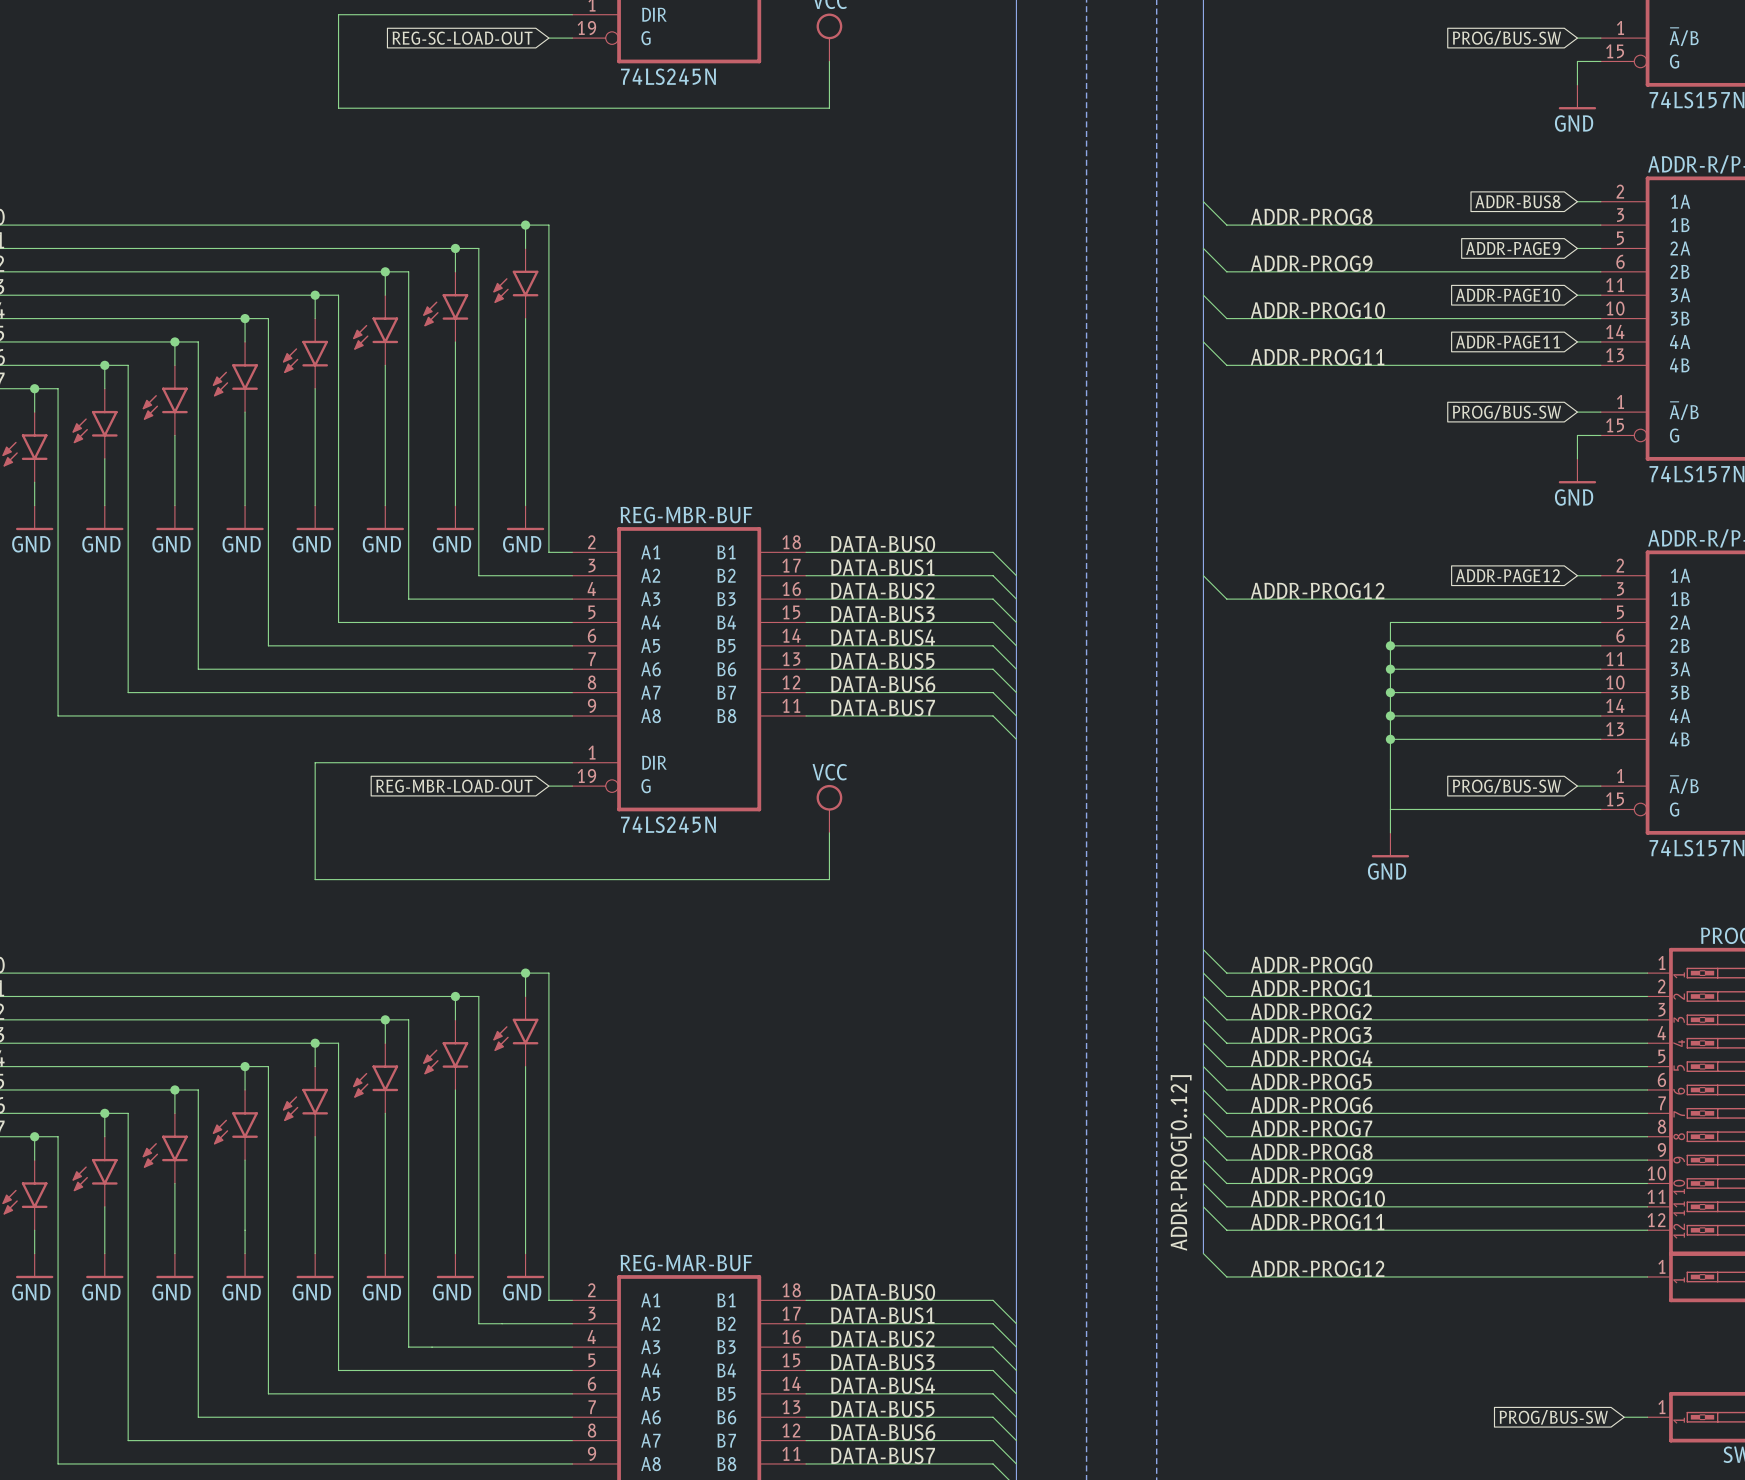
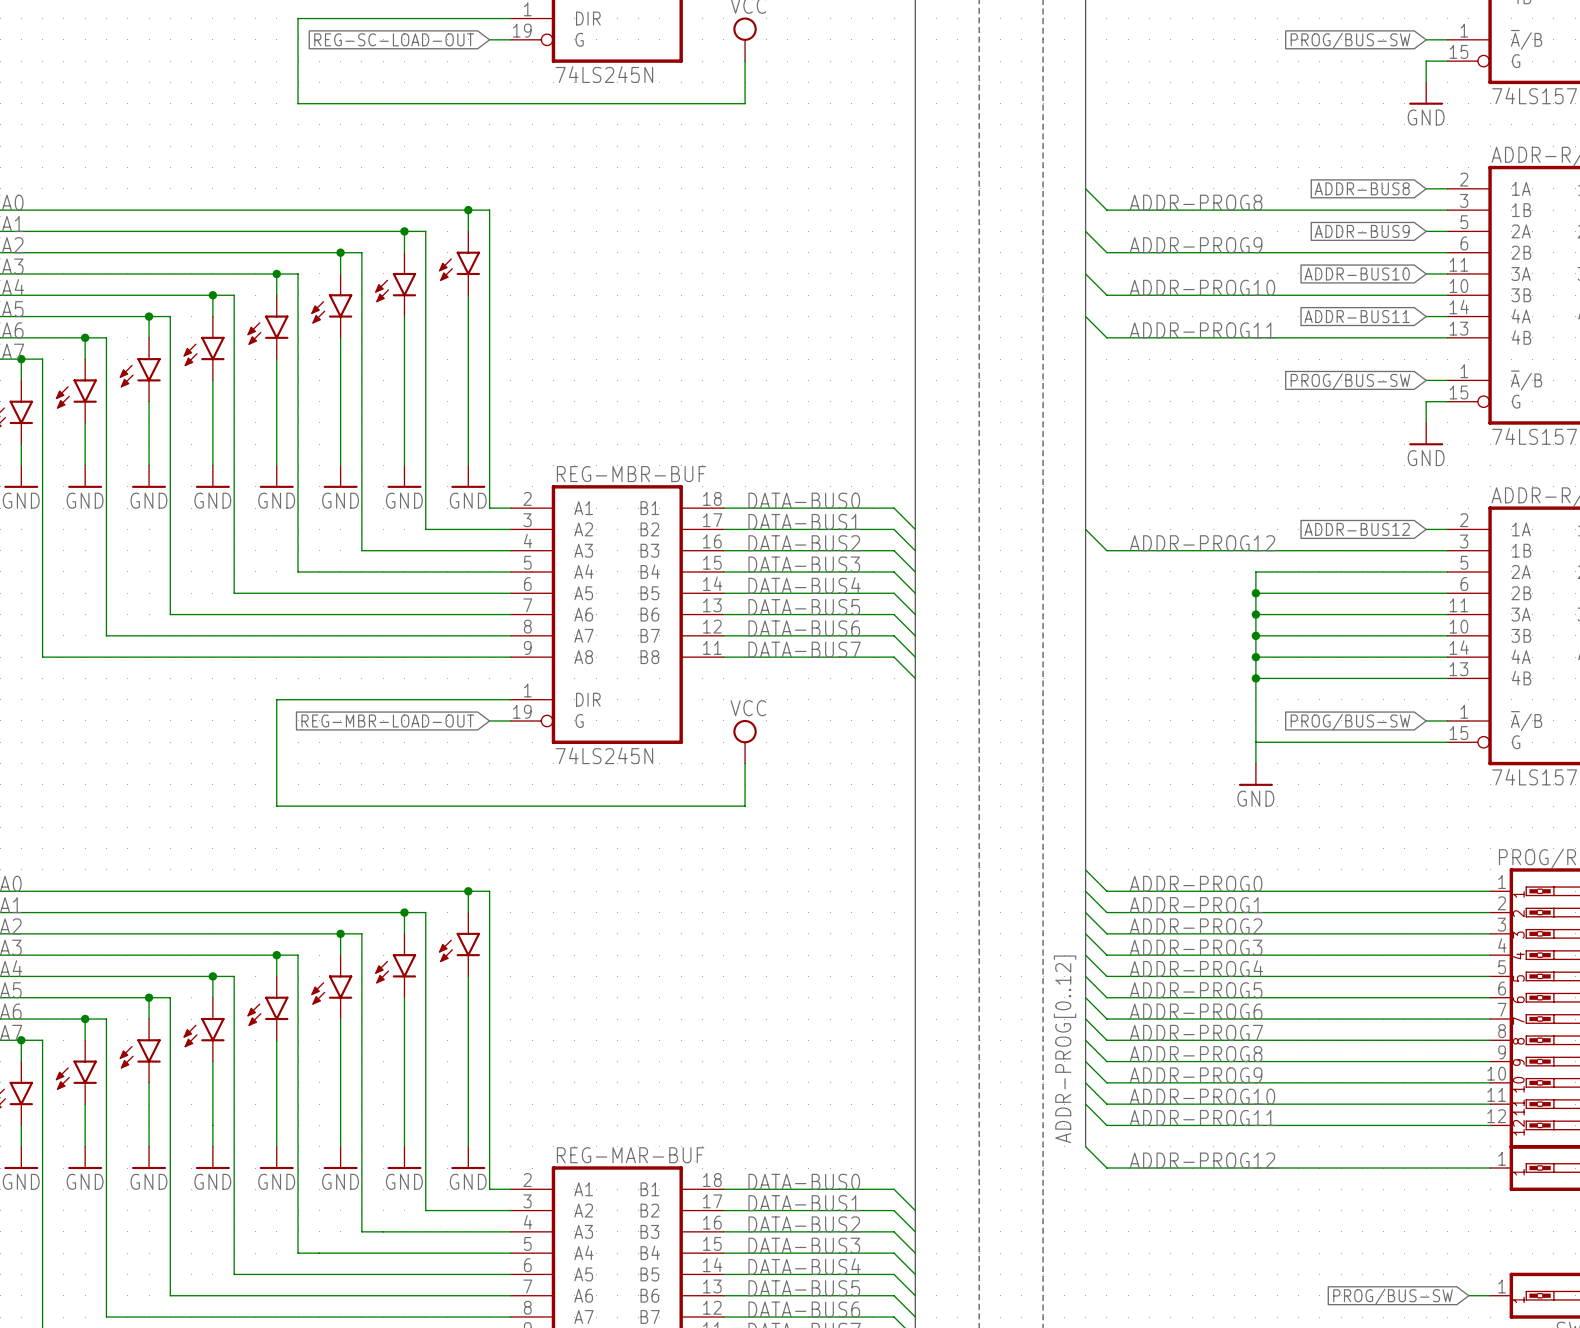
global label: ADDR-PAGE9 (1513, 248) -> ADDR-BUS9 (1362, 231)
global label: ADDR-PAGE10 (1508, 295) -> ADDR-BUS10 (1357, 273)
global label: ADDR-PAGE11 (1507, 342) -> ADDR-BUS11 (1357, 316)
global label: ADDR-PAGE12 (1507, 575) -> ADDR-BUS12 (1357, 529)

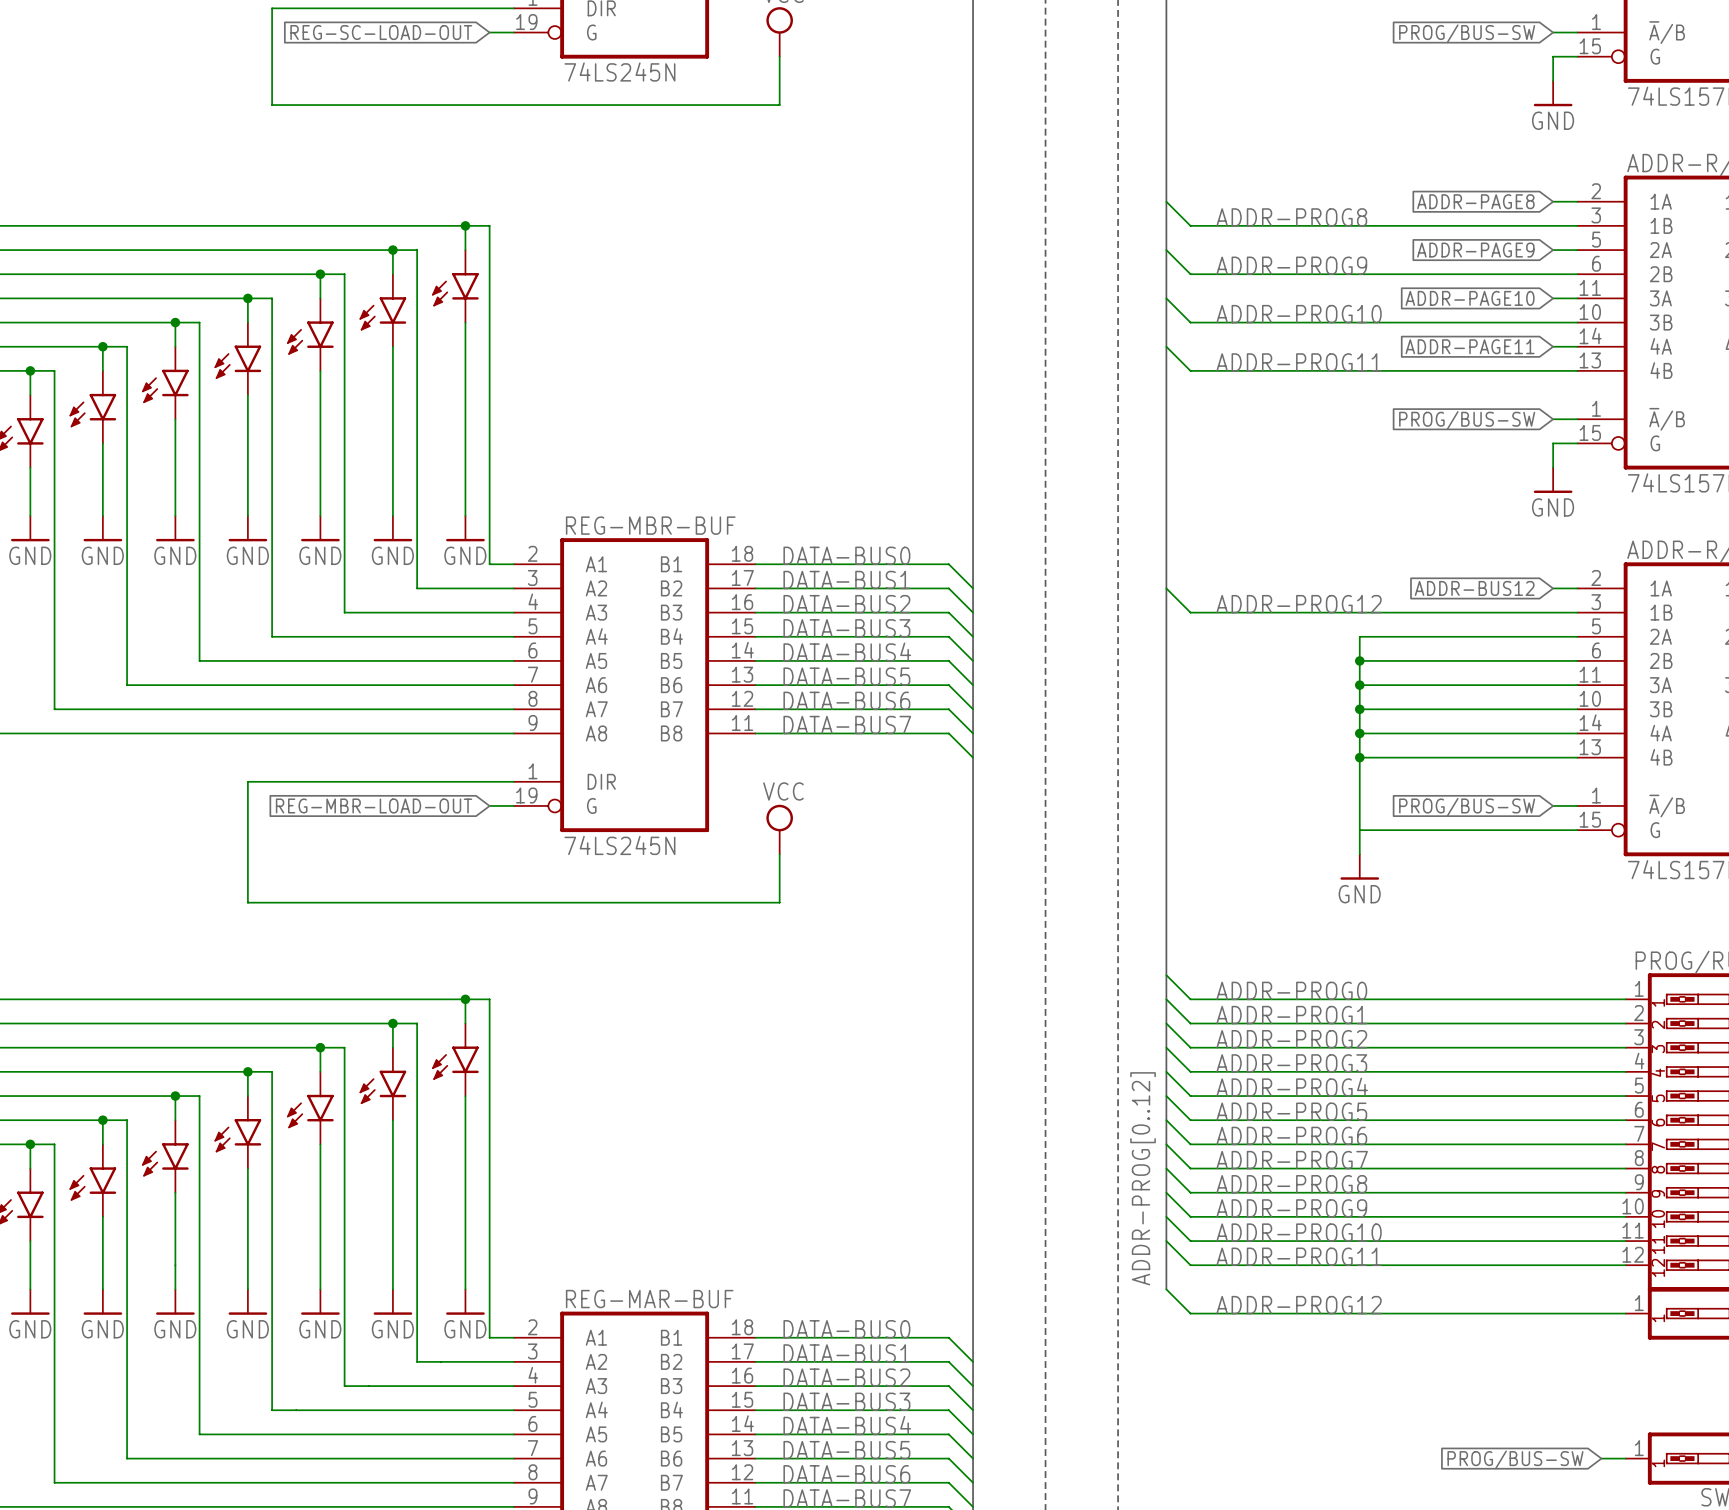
global label: ADDR-BUS8 (1362, 188) -> ADDR-PAGE8 (1475, 201)
global label: ADDR-BUS9 (1362, 231) -> ADDR-PAGE9 (1475, 250)
global label: ADDR-BUS10 (1357, 273) -> ADDR-PAGE10 (1470, 298)
global label: ADDR-BUS11 (1357, 316) -> ADDR-PAGE11 (1470, 346)

